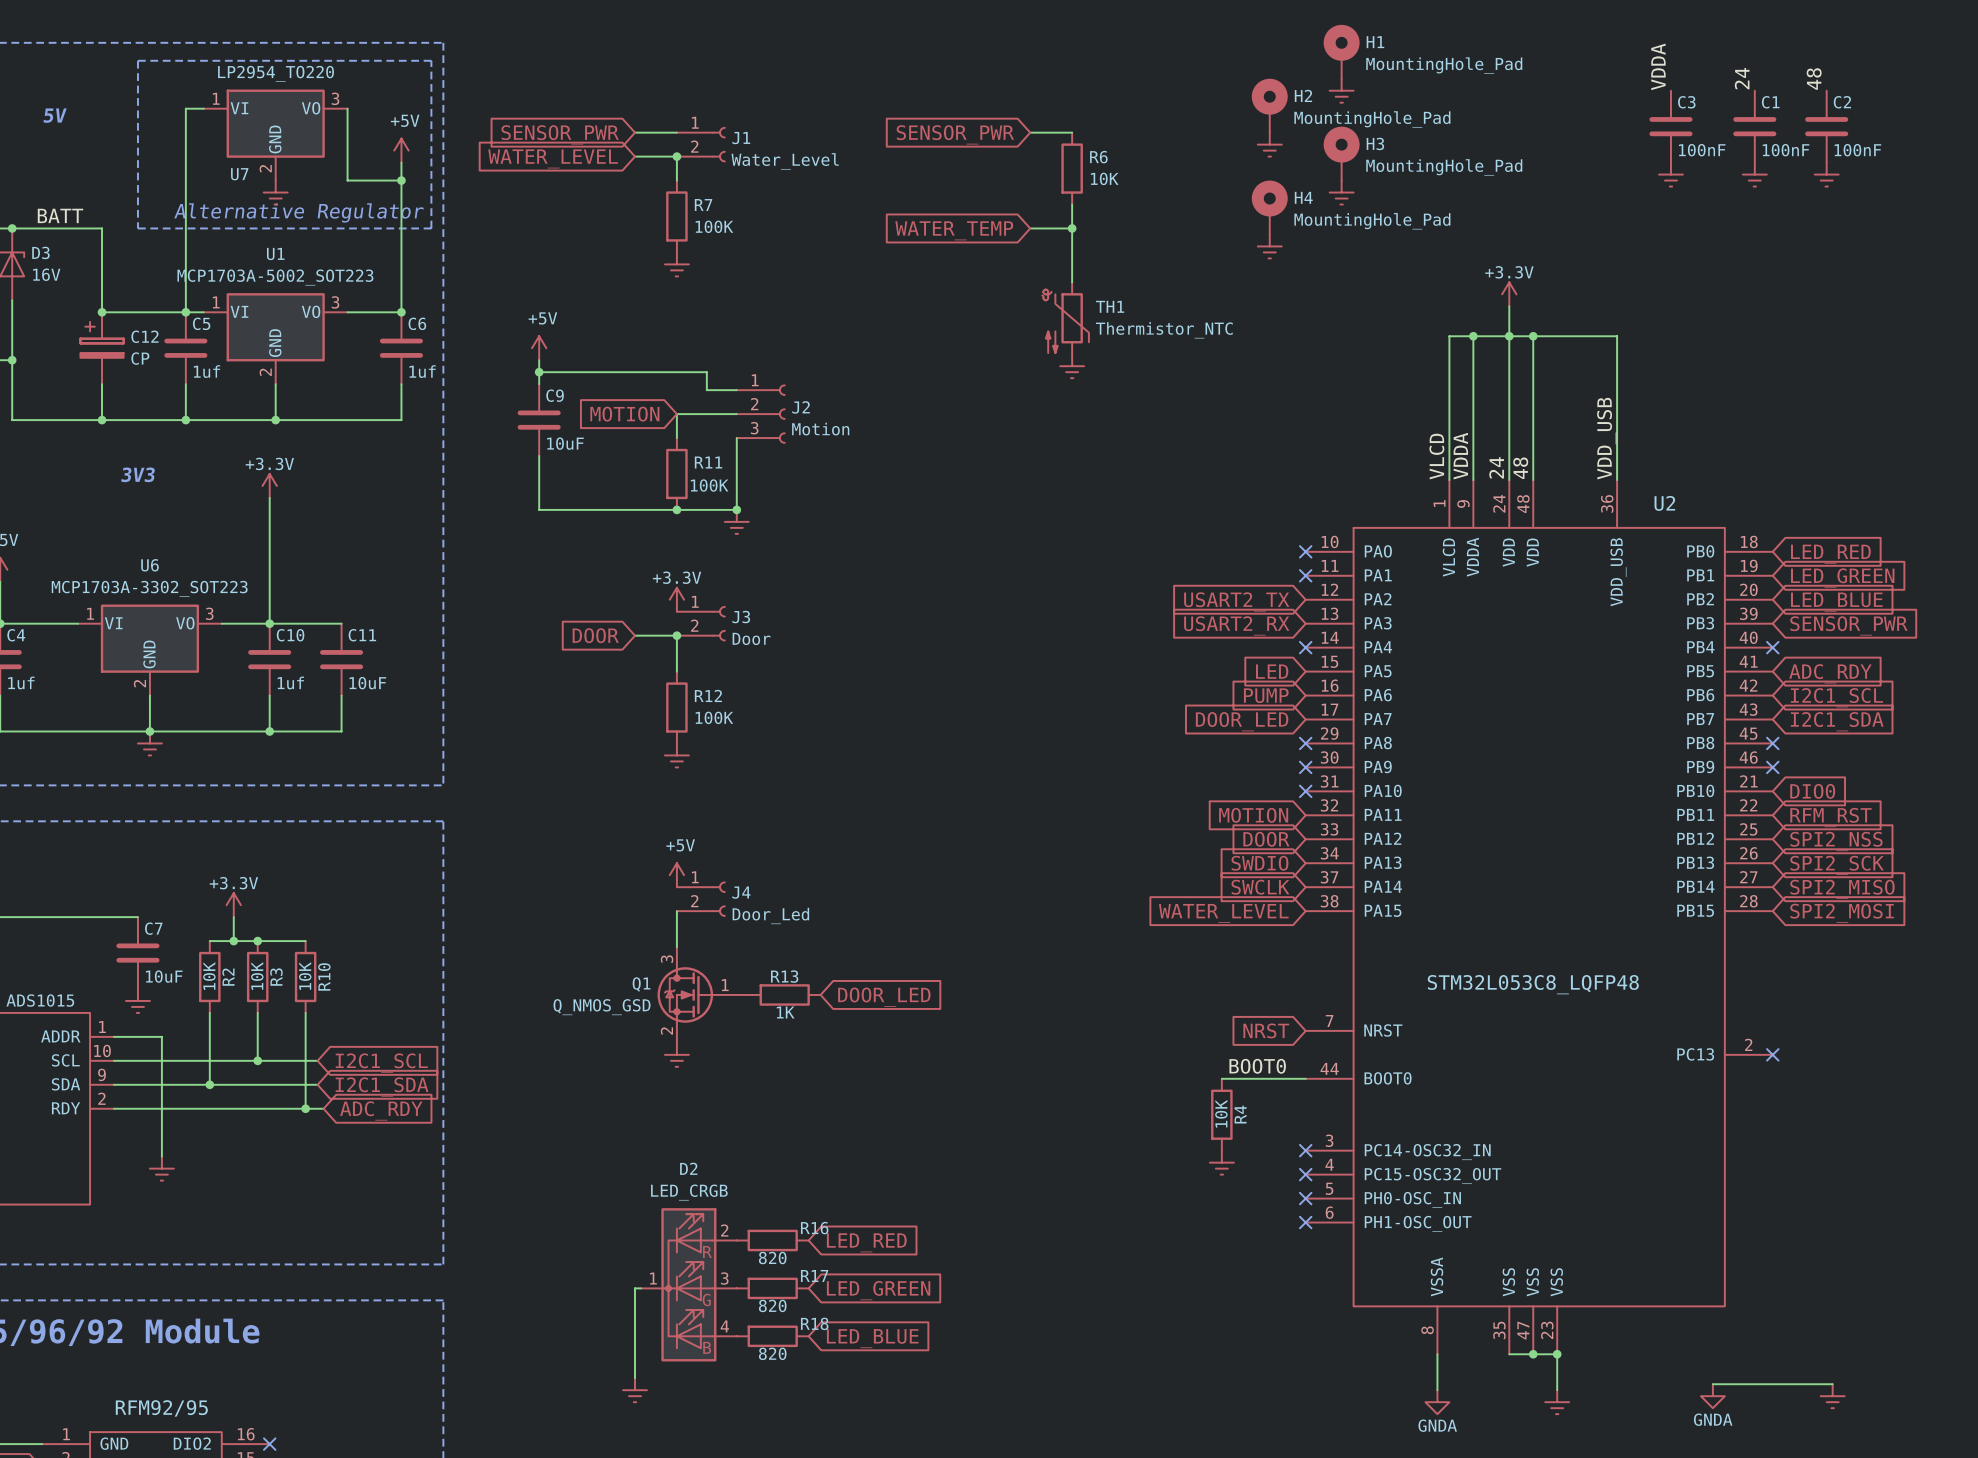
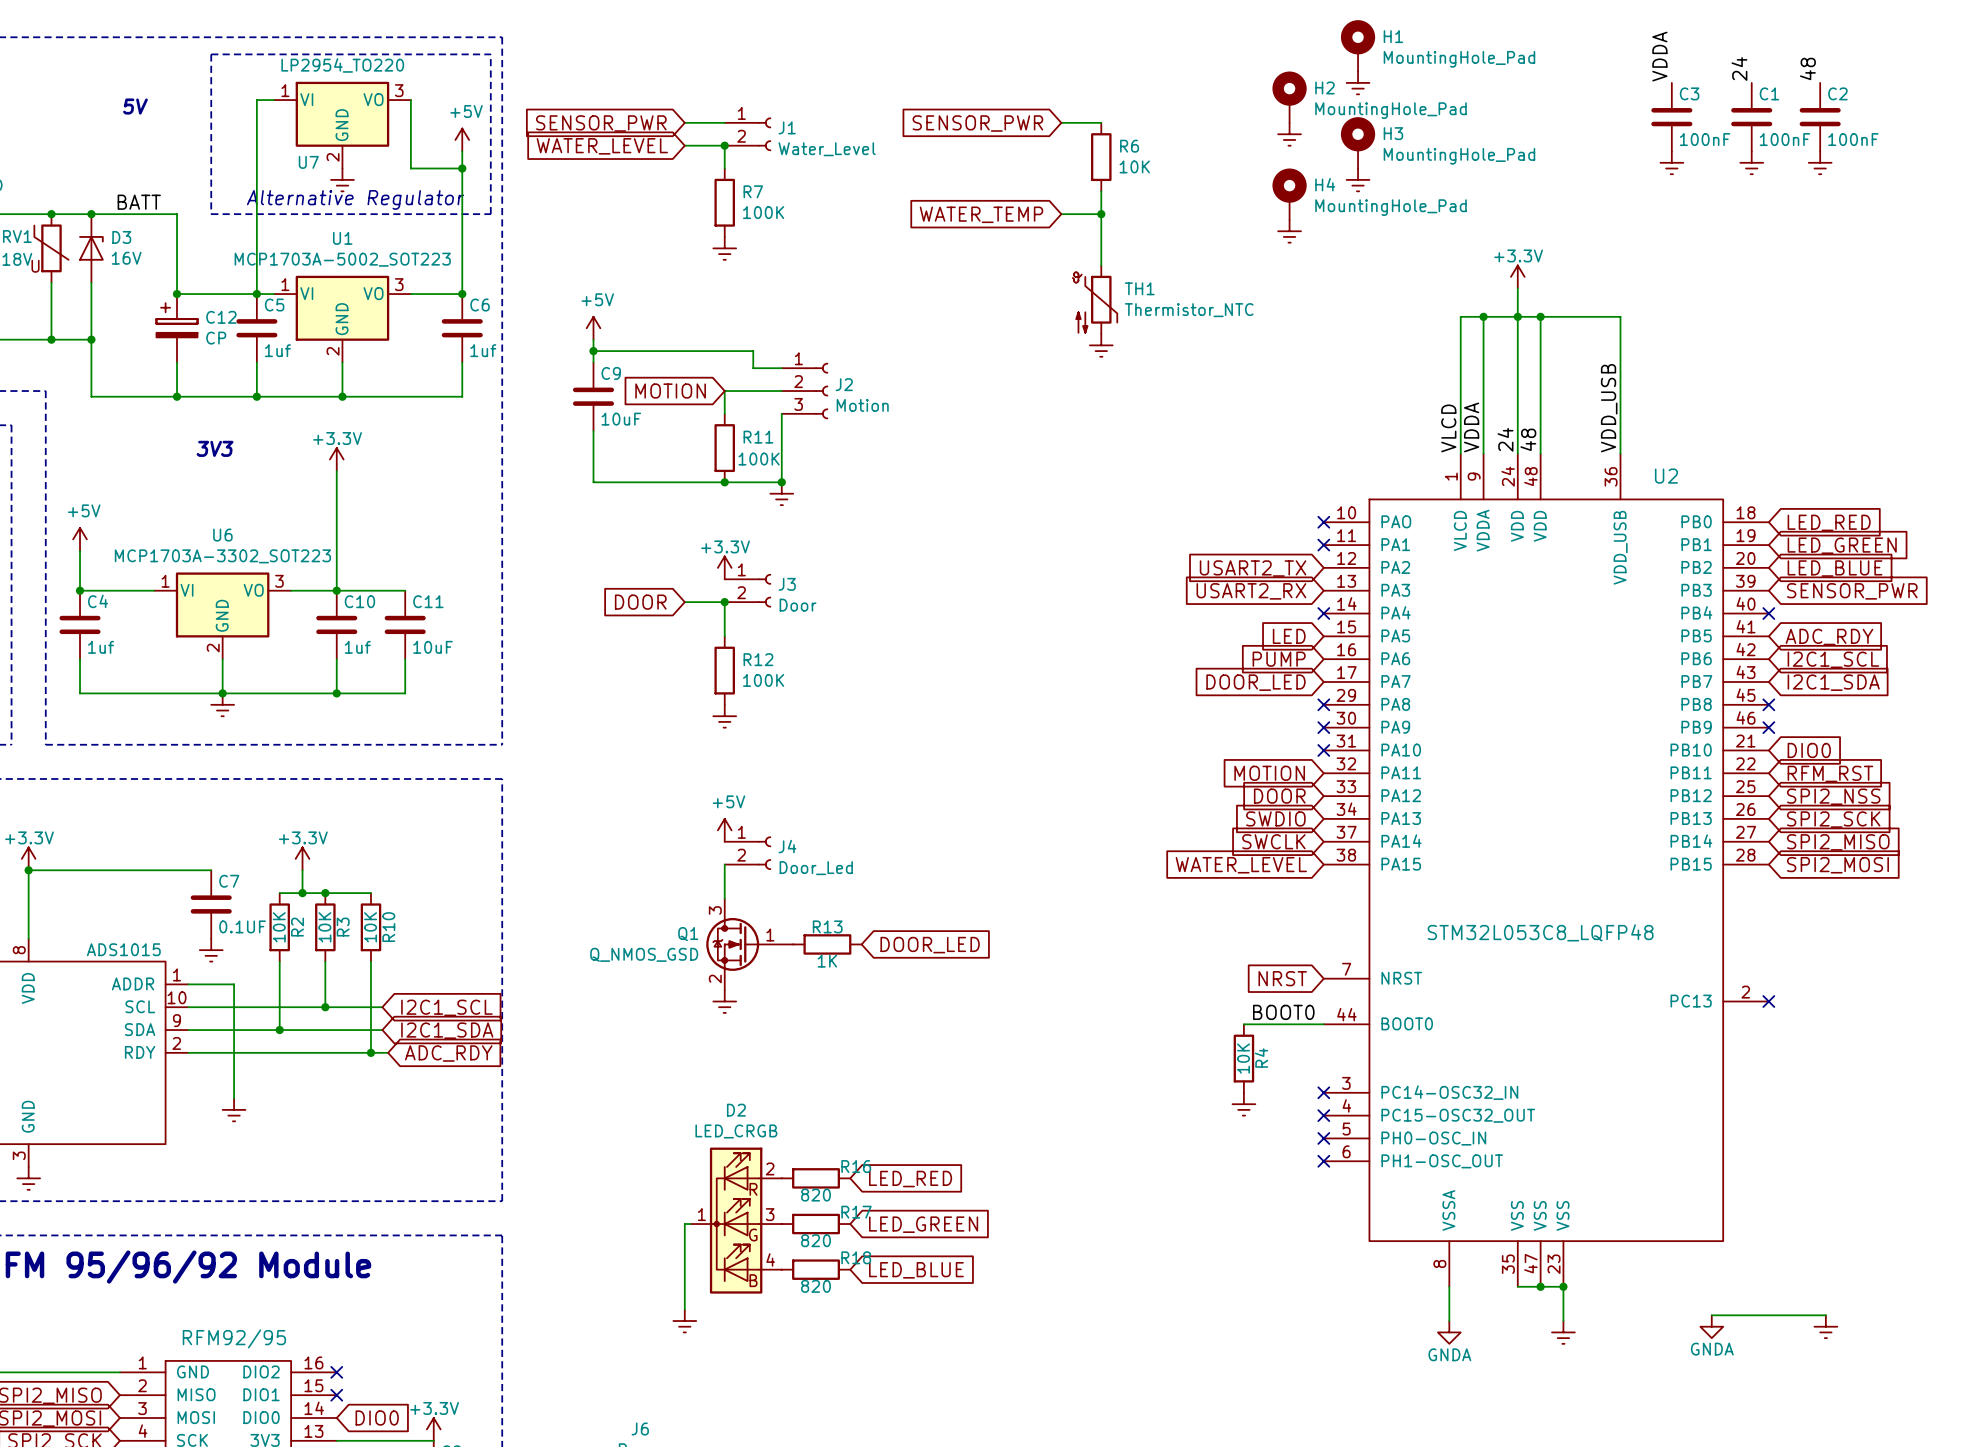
C7 value: 10uF (164, 976) -> 0.1UF (242, 926)

